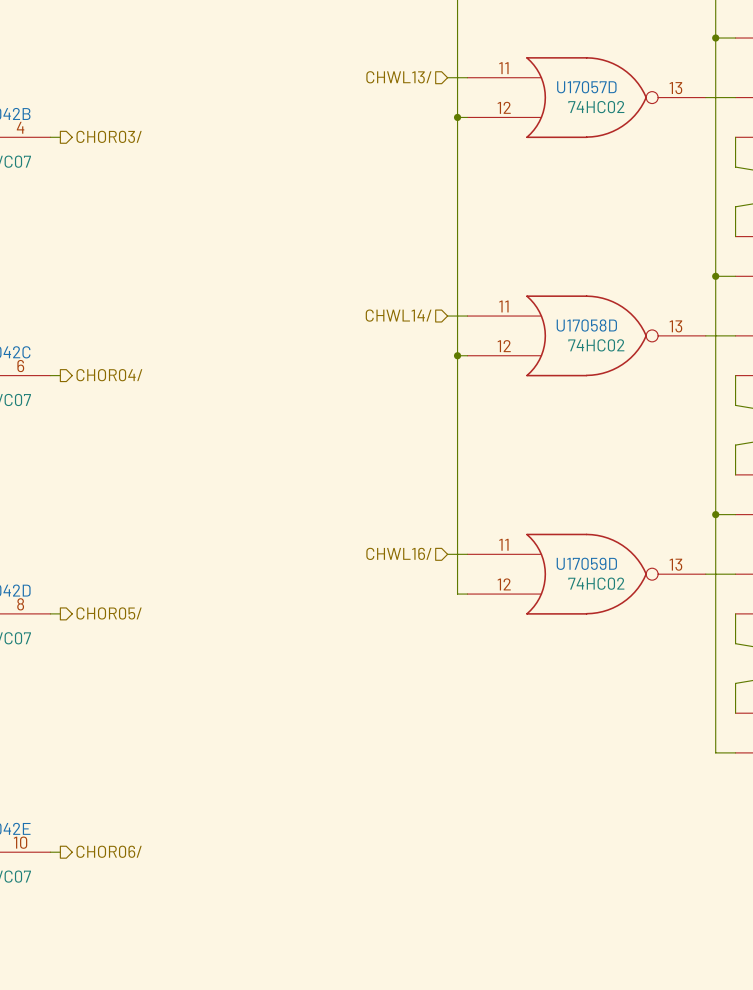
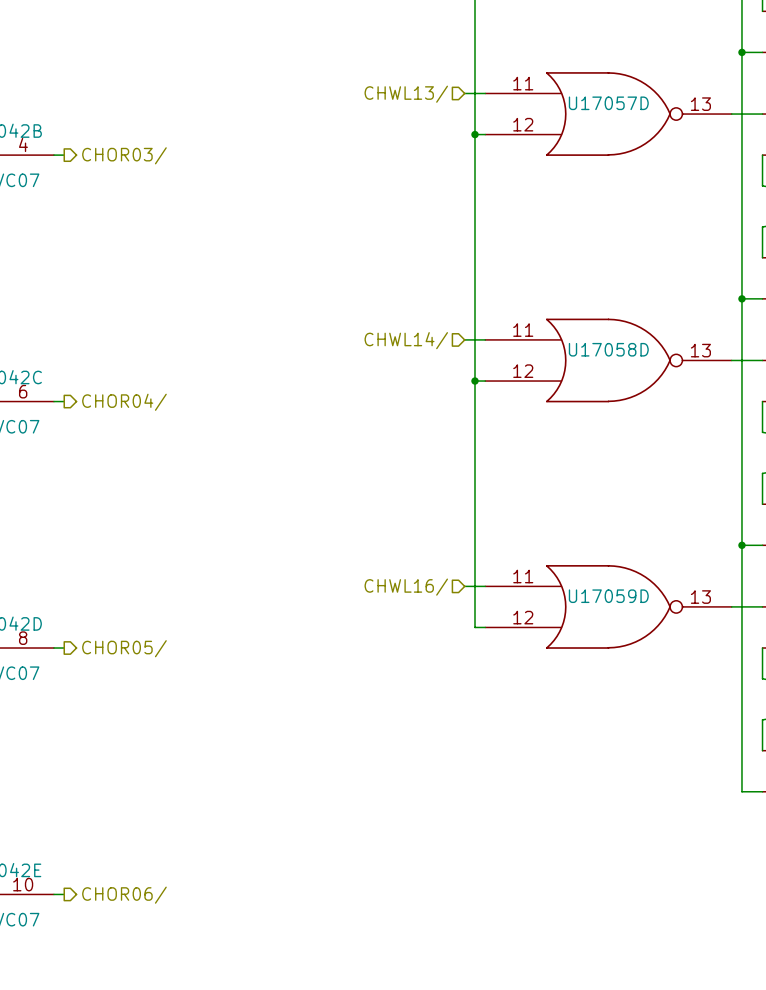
U17057D value: 74HC02 (596, 107) -> none
U17058D value: 74HC02 (596, 345) -> none
U17059D value: 74HC02 (596, 583) -> none

